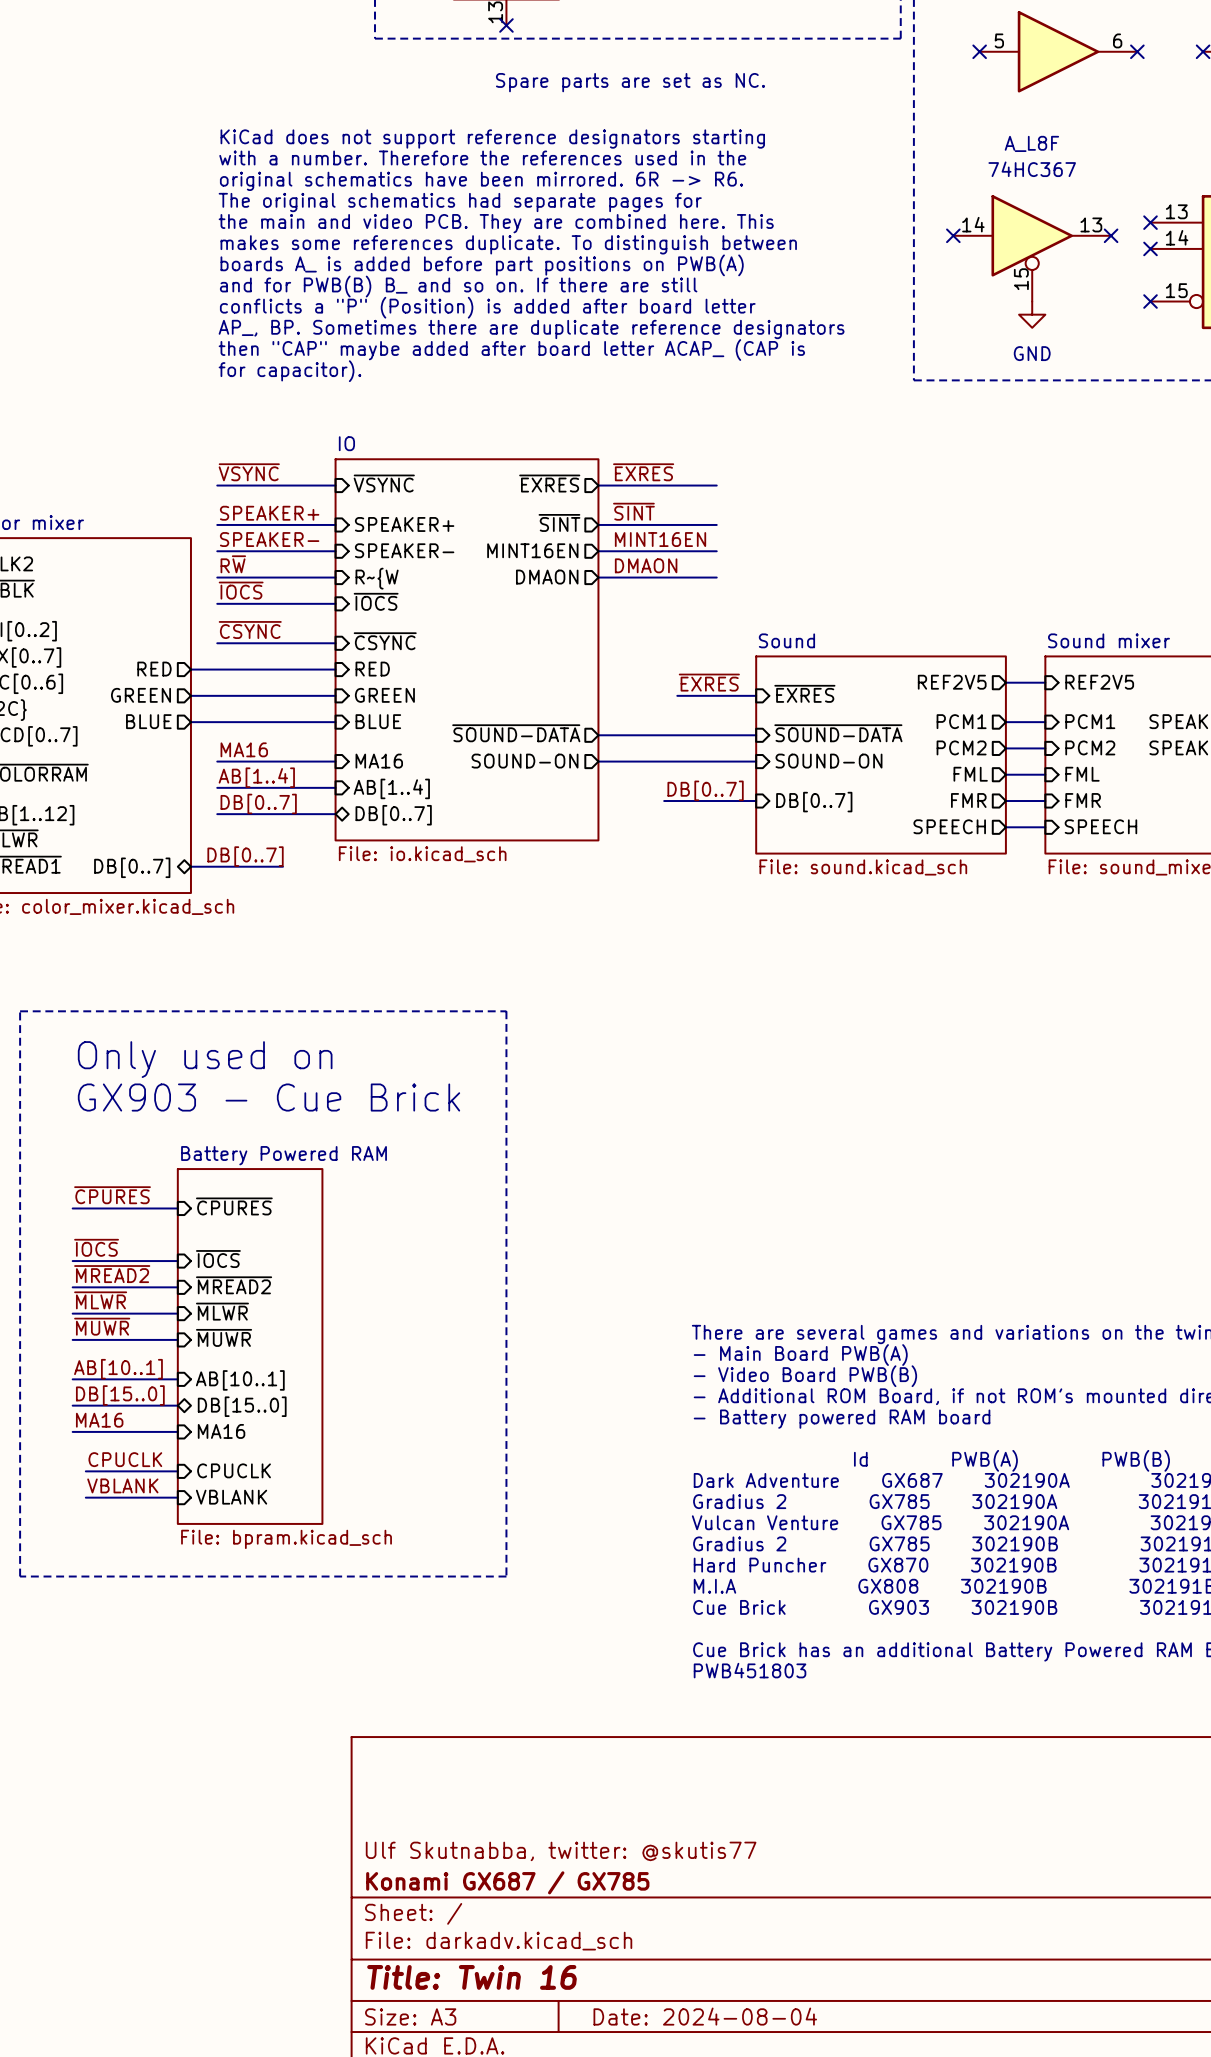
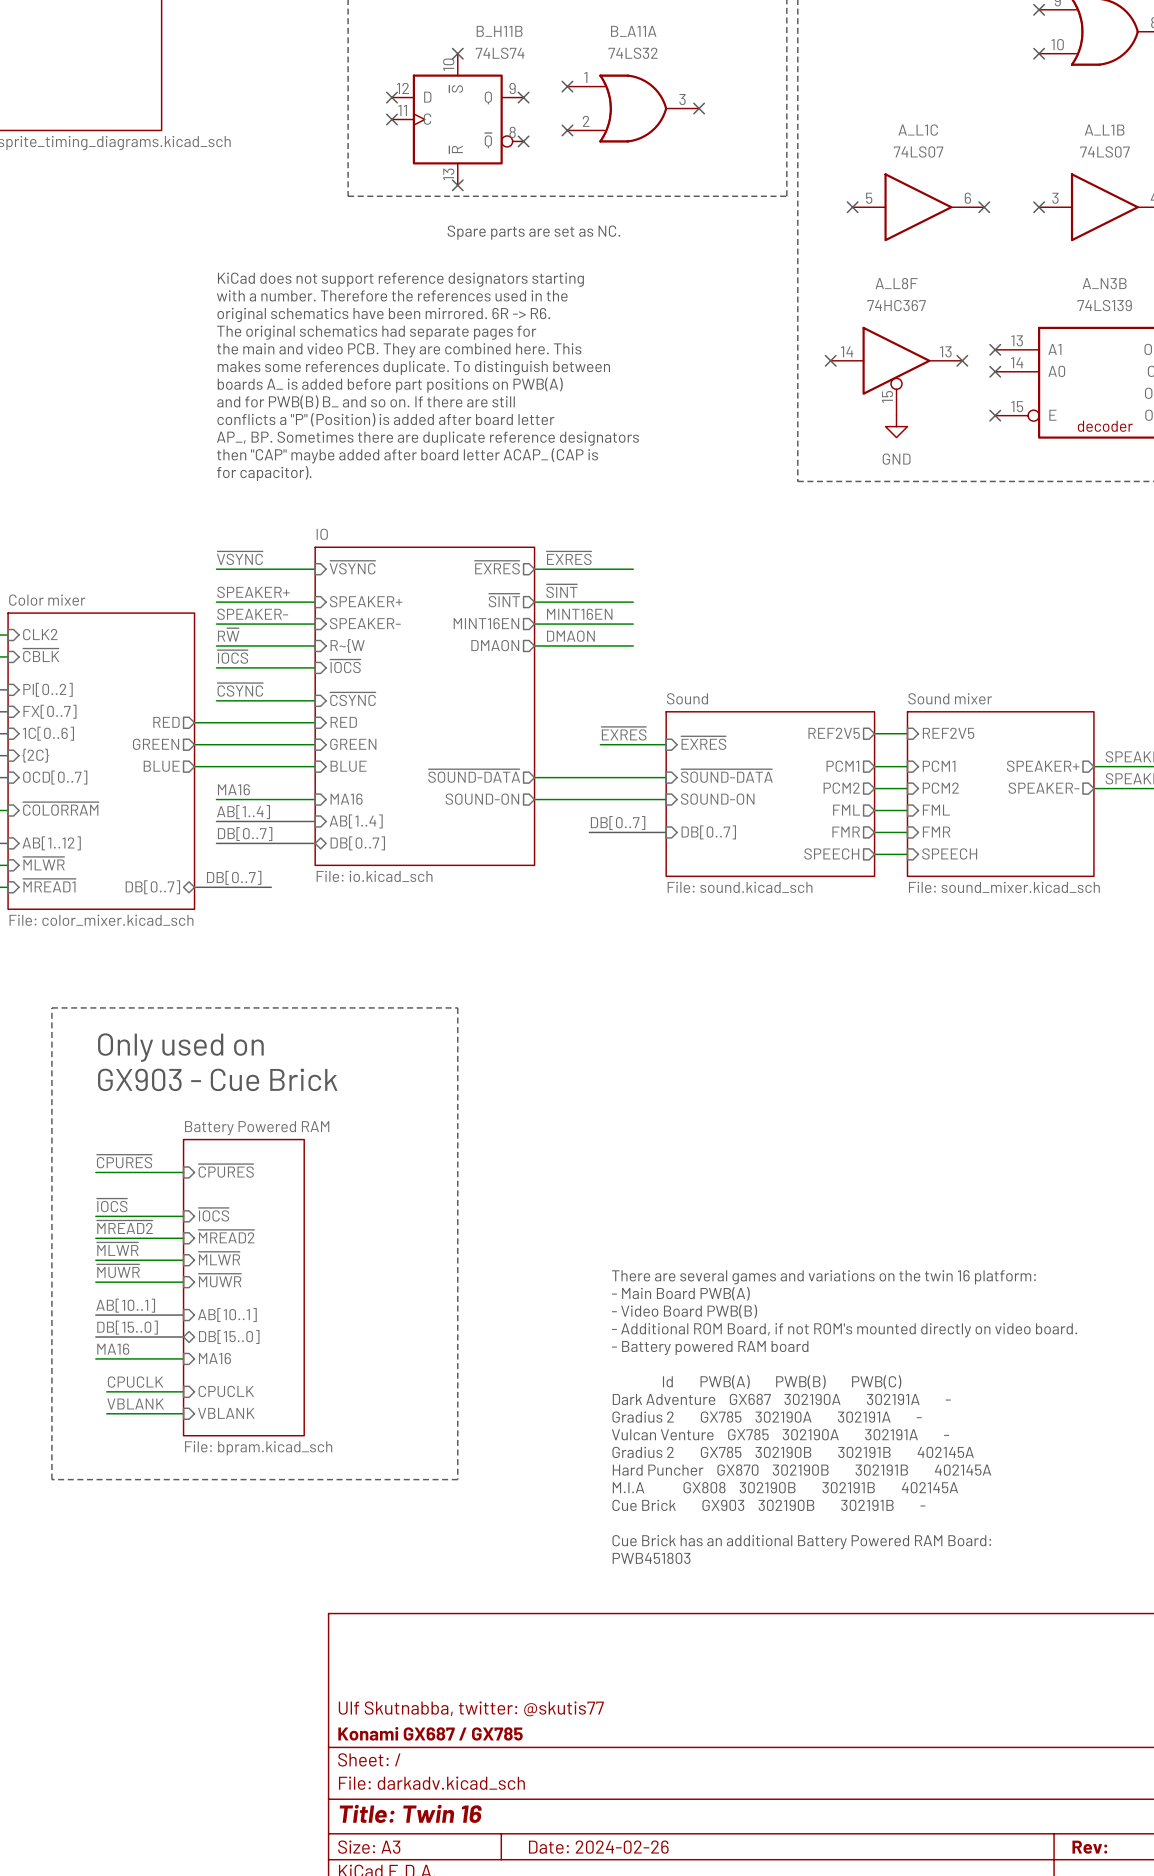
title block: Date: 2024-08-04 (705, 2016) -> Date: 2024-02-26 (598, 1847)

